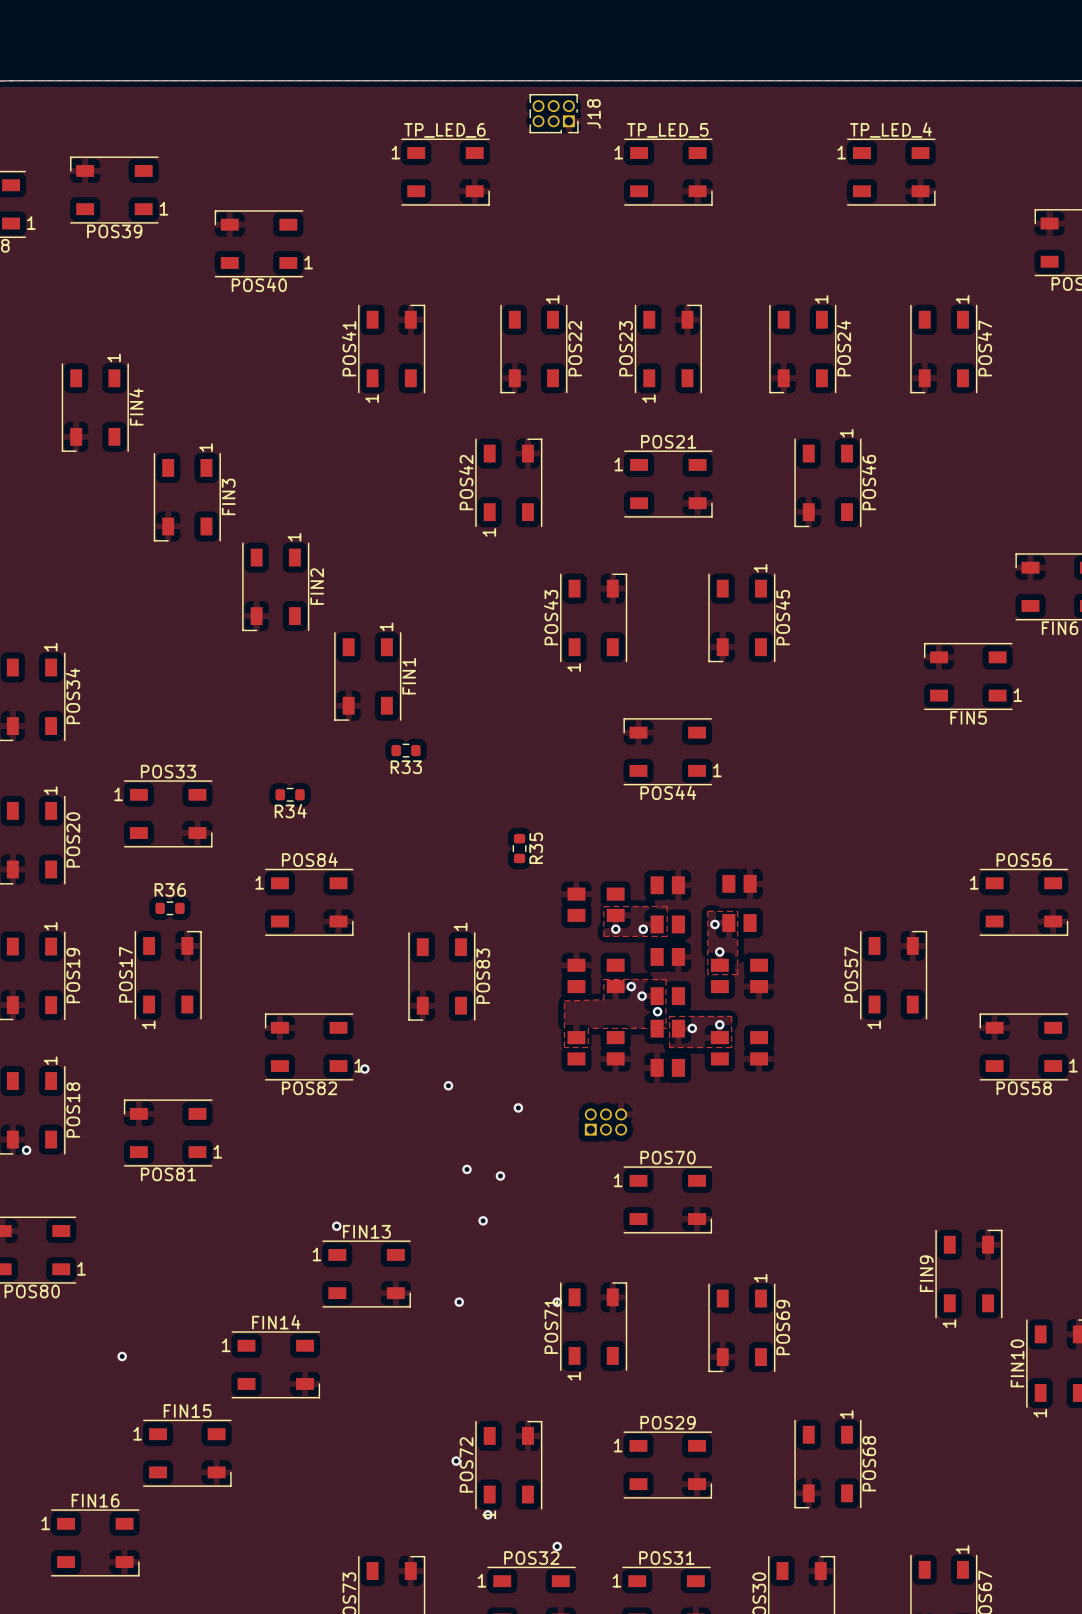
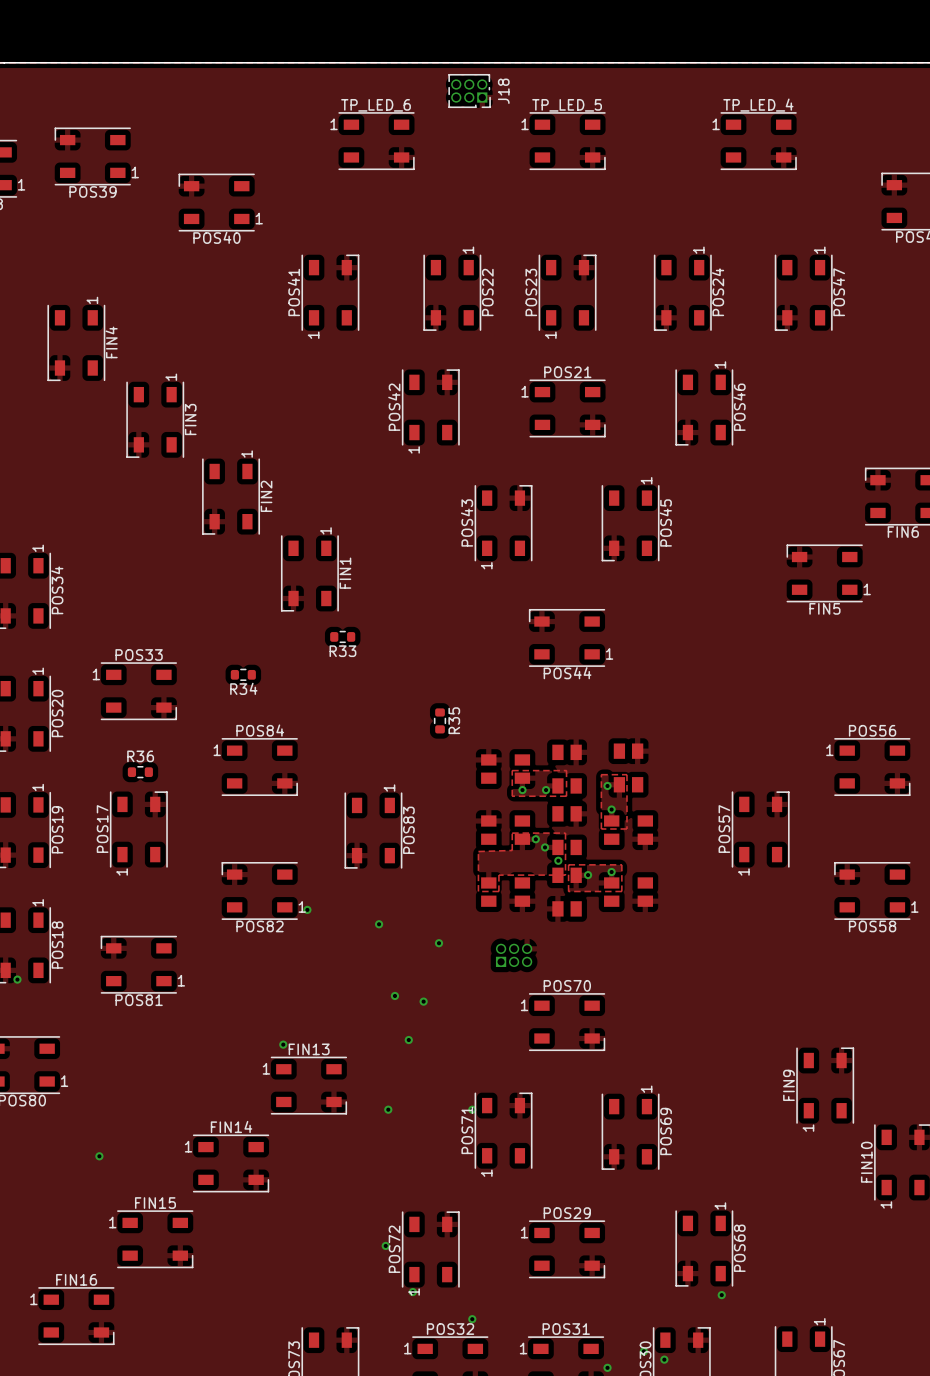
via: none -> (721, 1295)
via: none -> (643, 1351)
via: none -> (664, 1359)
via: none -> (607, 1367)

